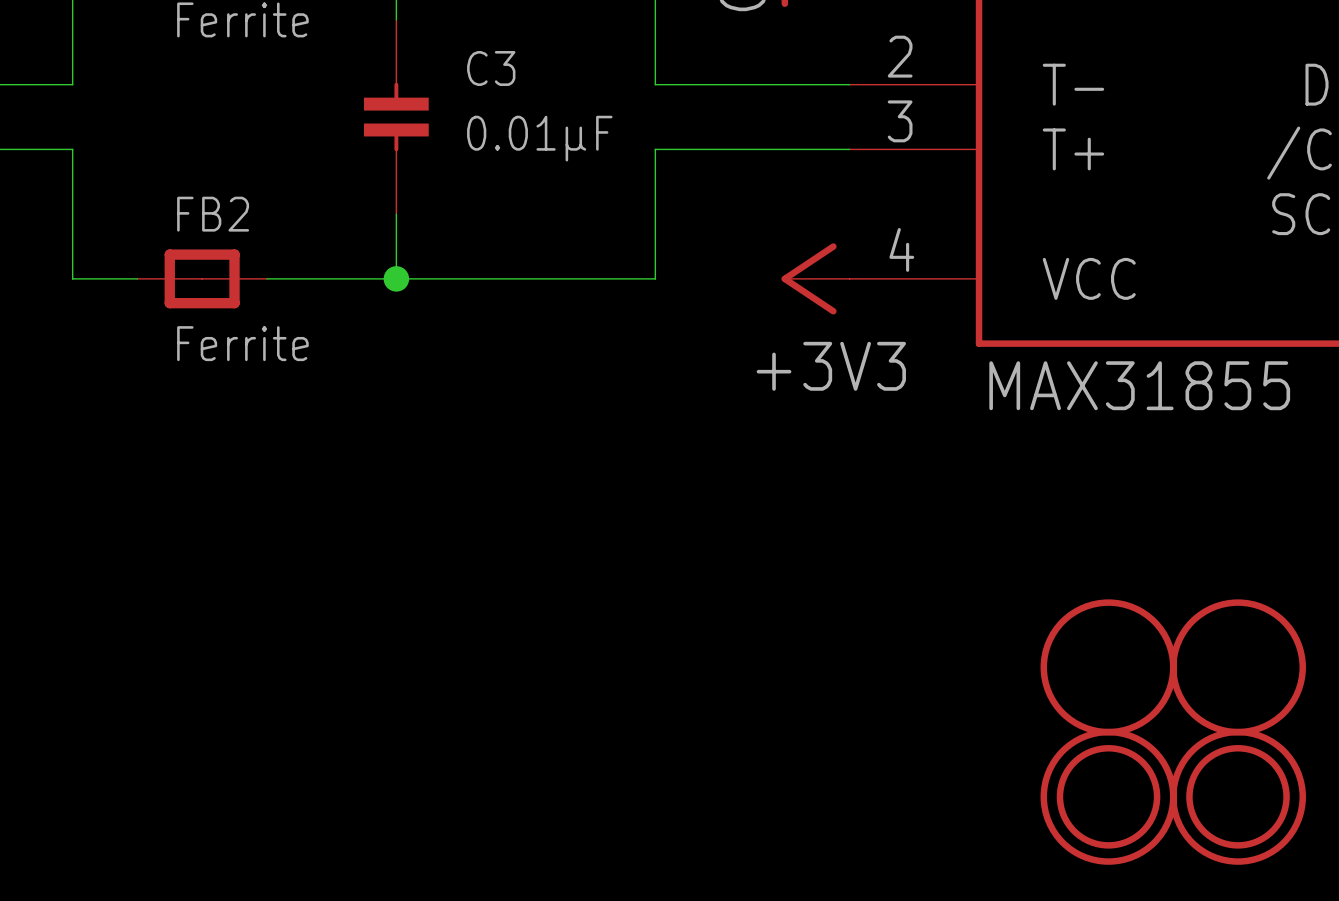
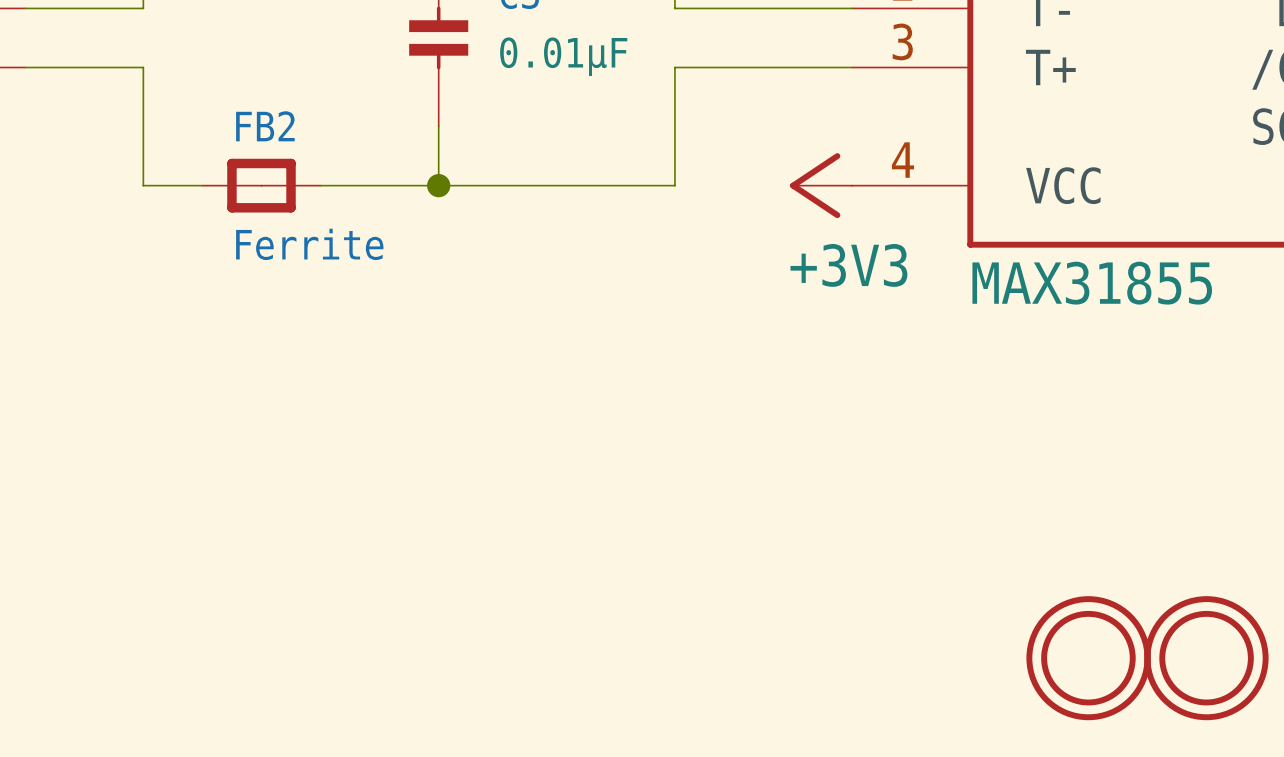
part: (1108, 667) -> none
part: (1238, 667) -> none

